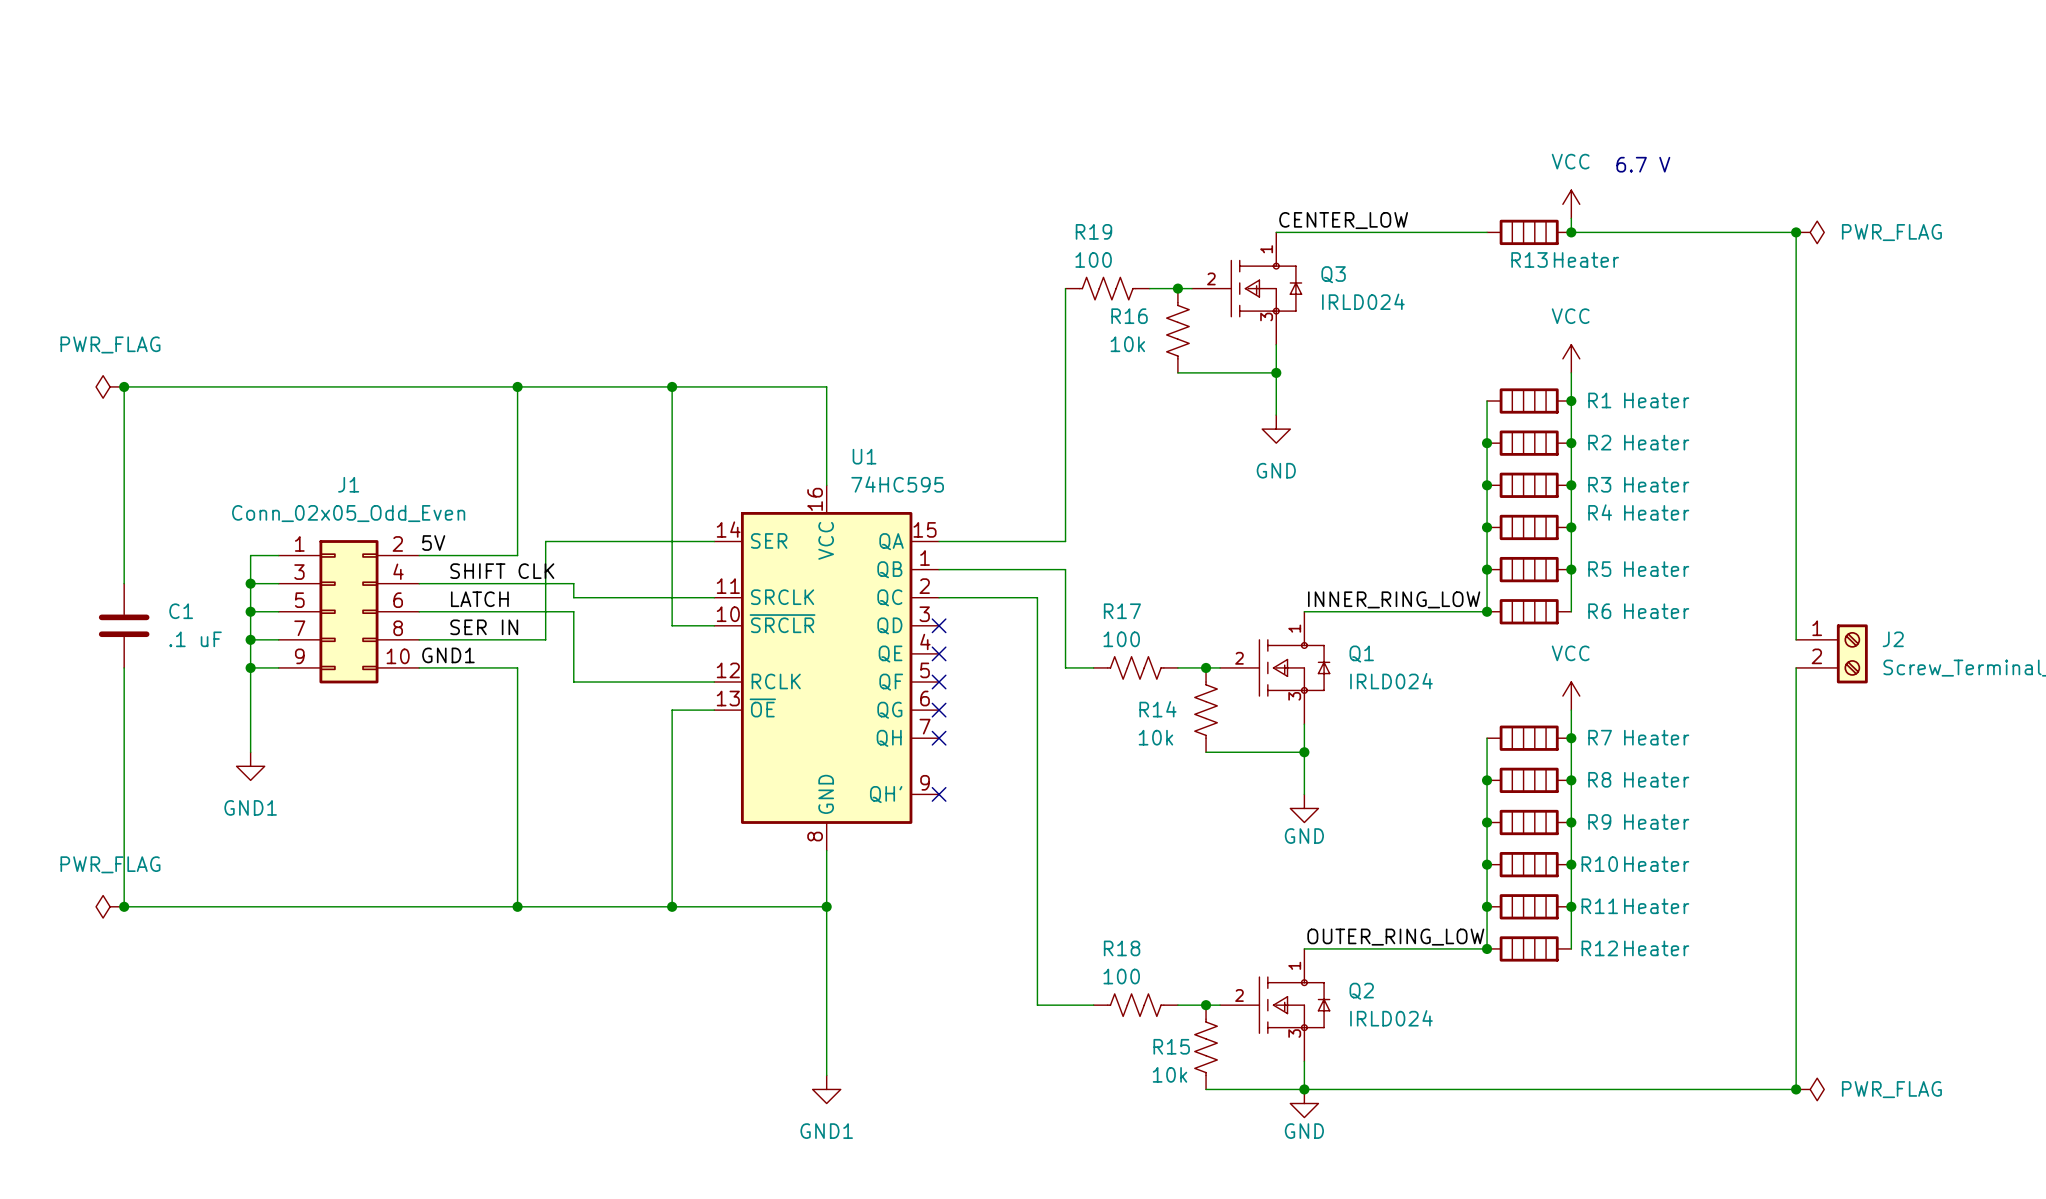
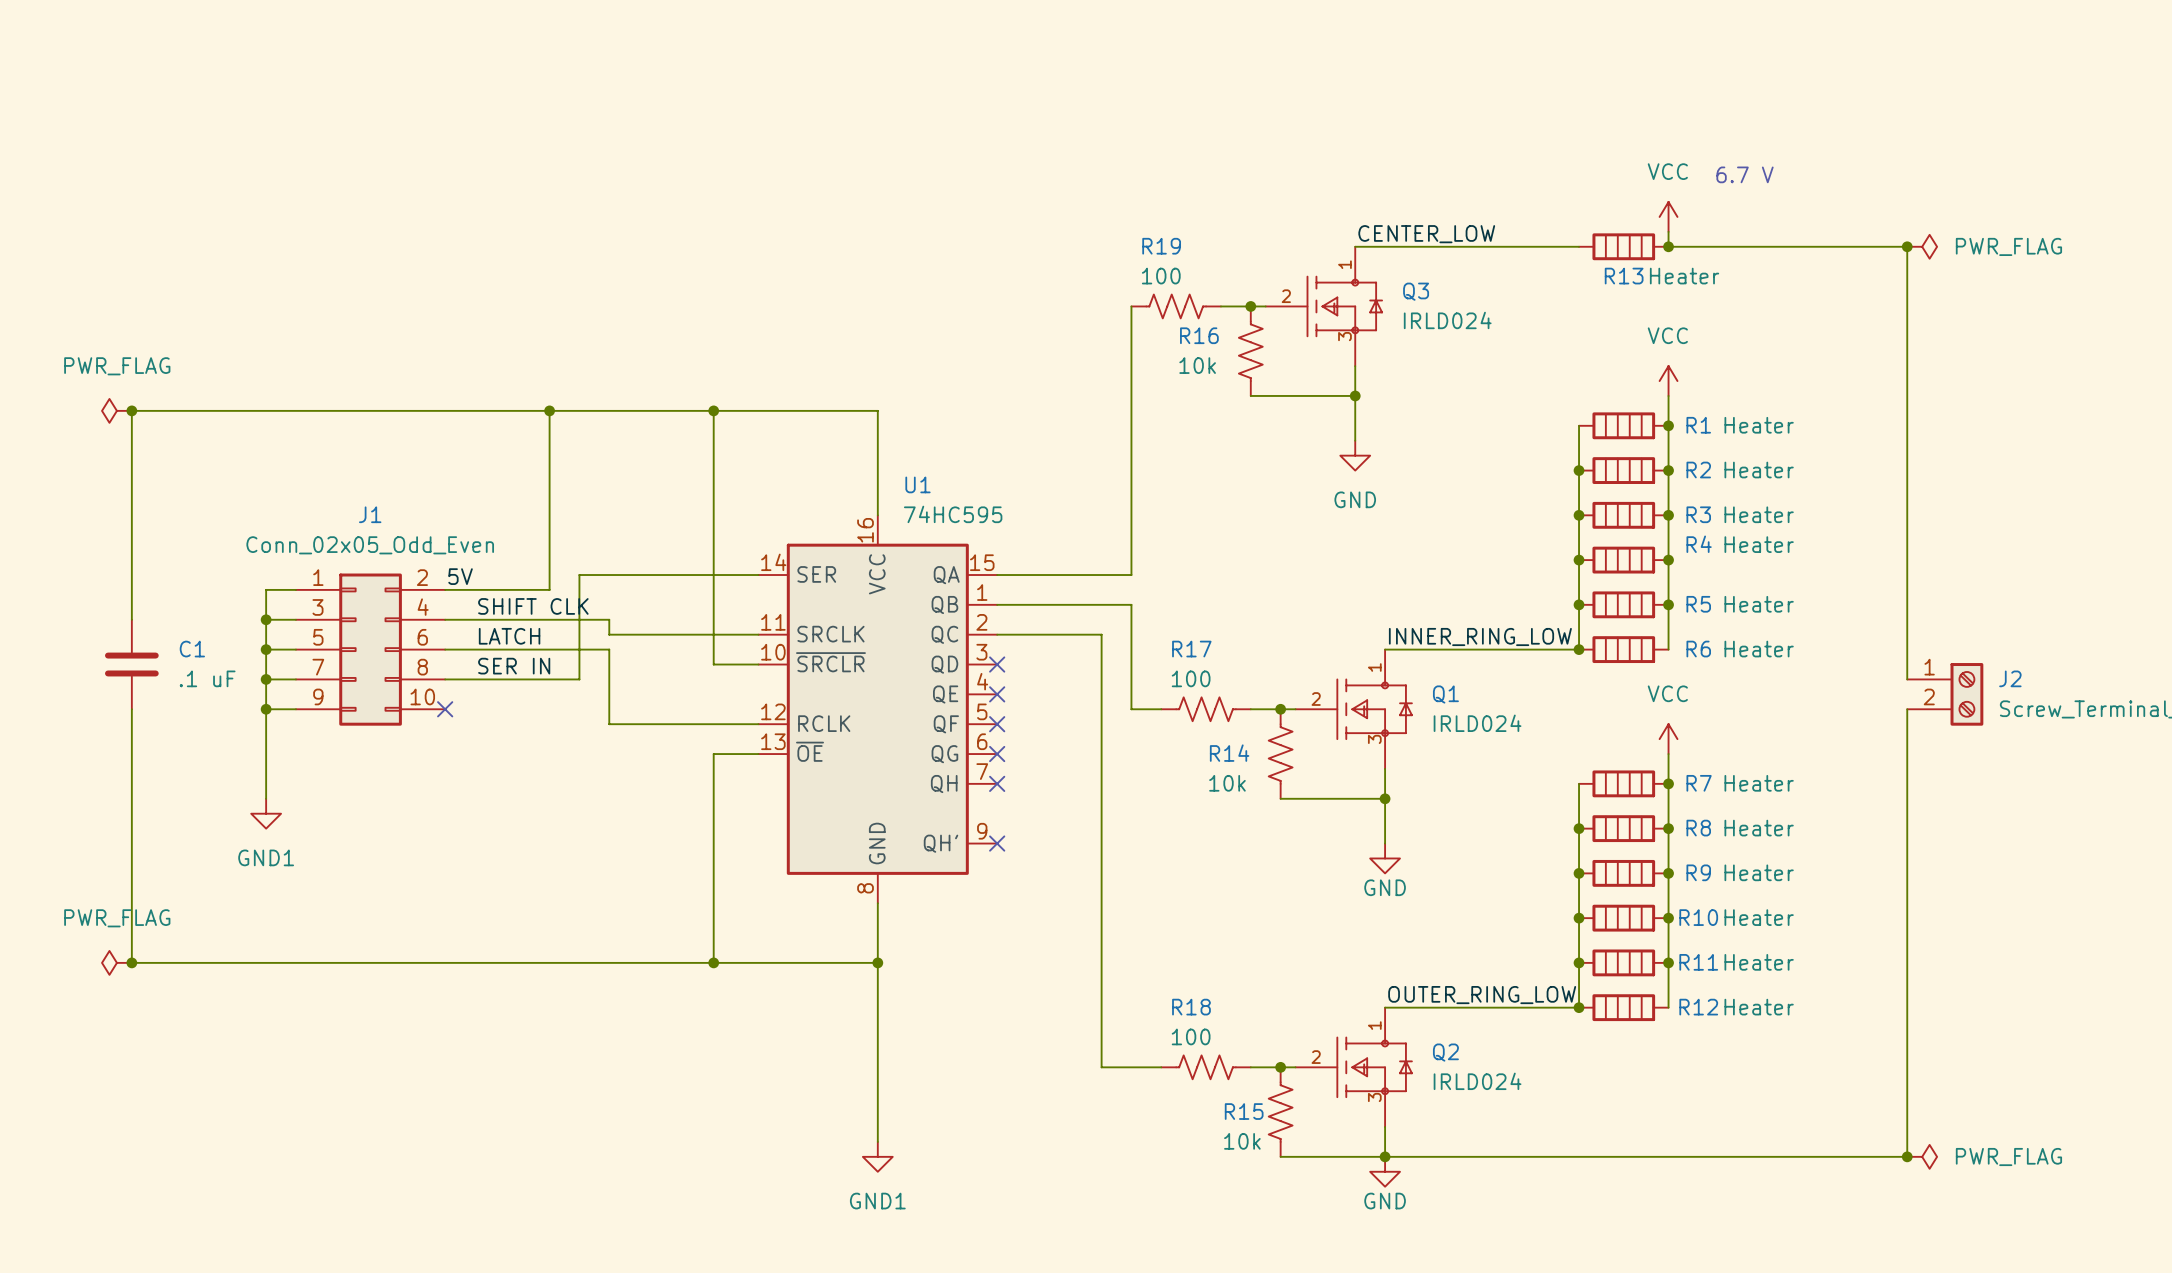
label: GND1 (448, 655) -> none
wire: (419, 667) (517, 667) (517, 906) -> none
no-connect mark: none -> (445, 709)
junction: (517, 906) -> none

